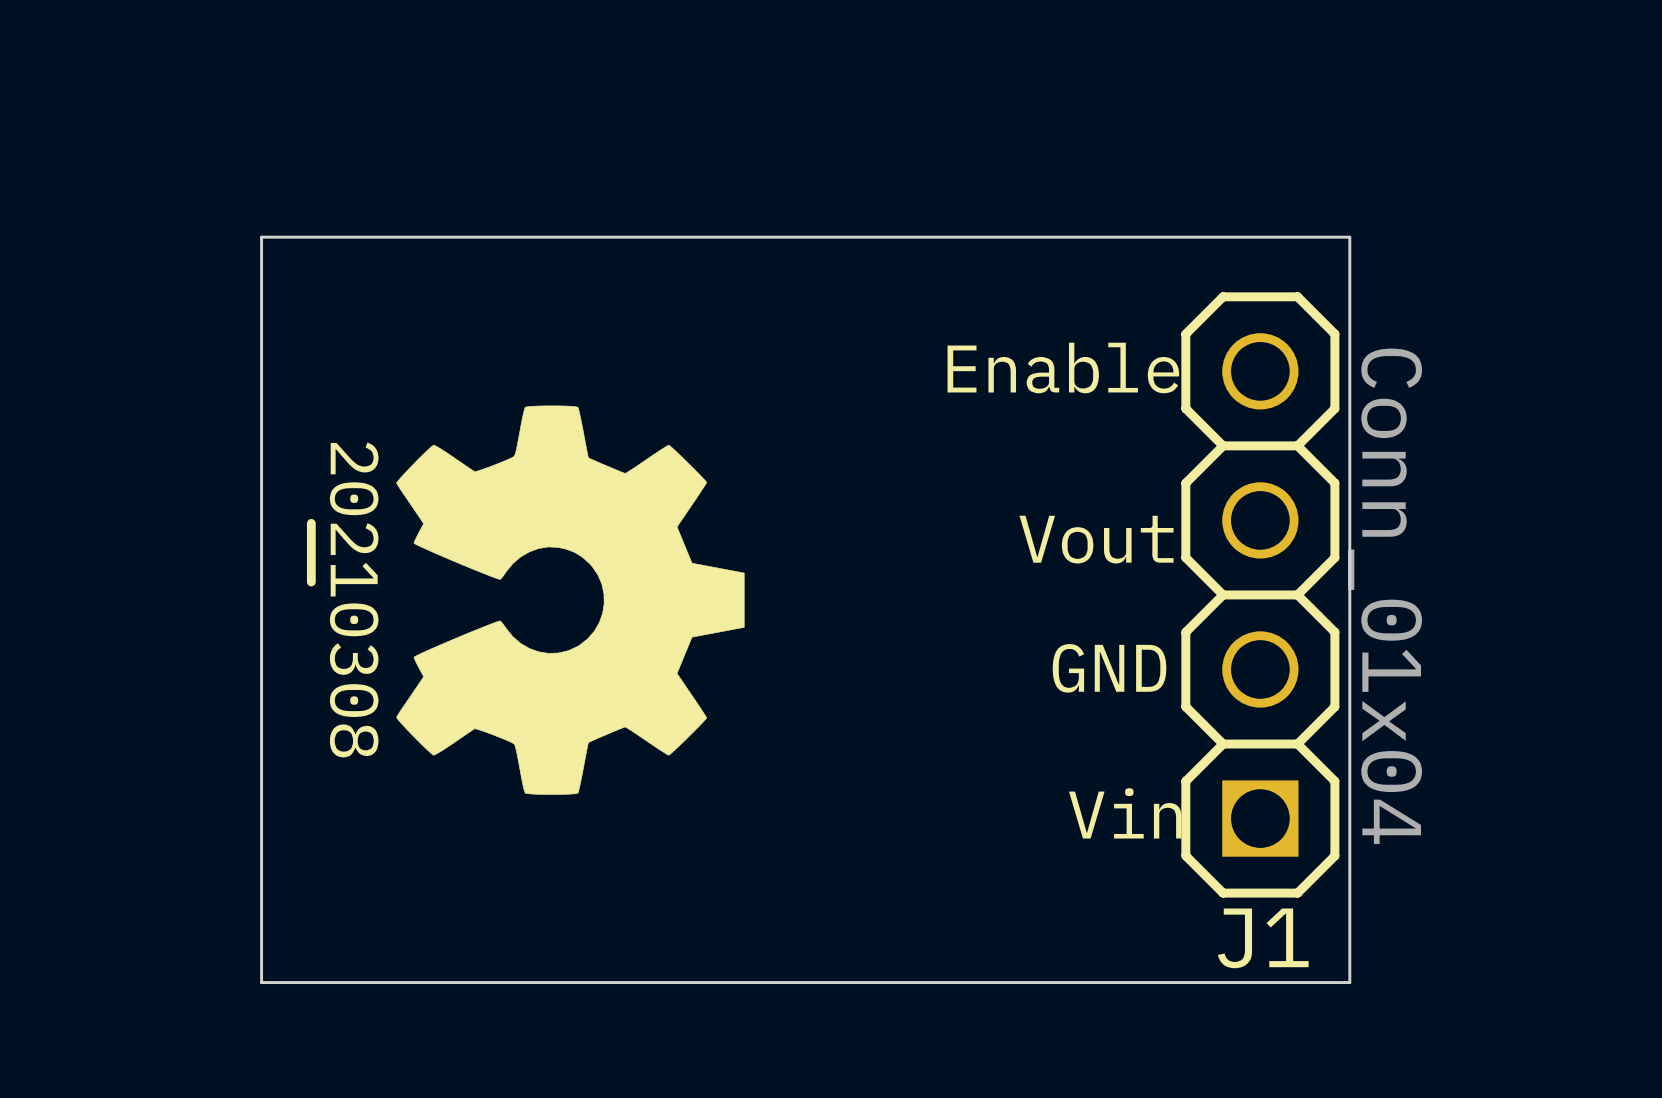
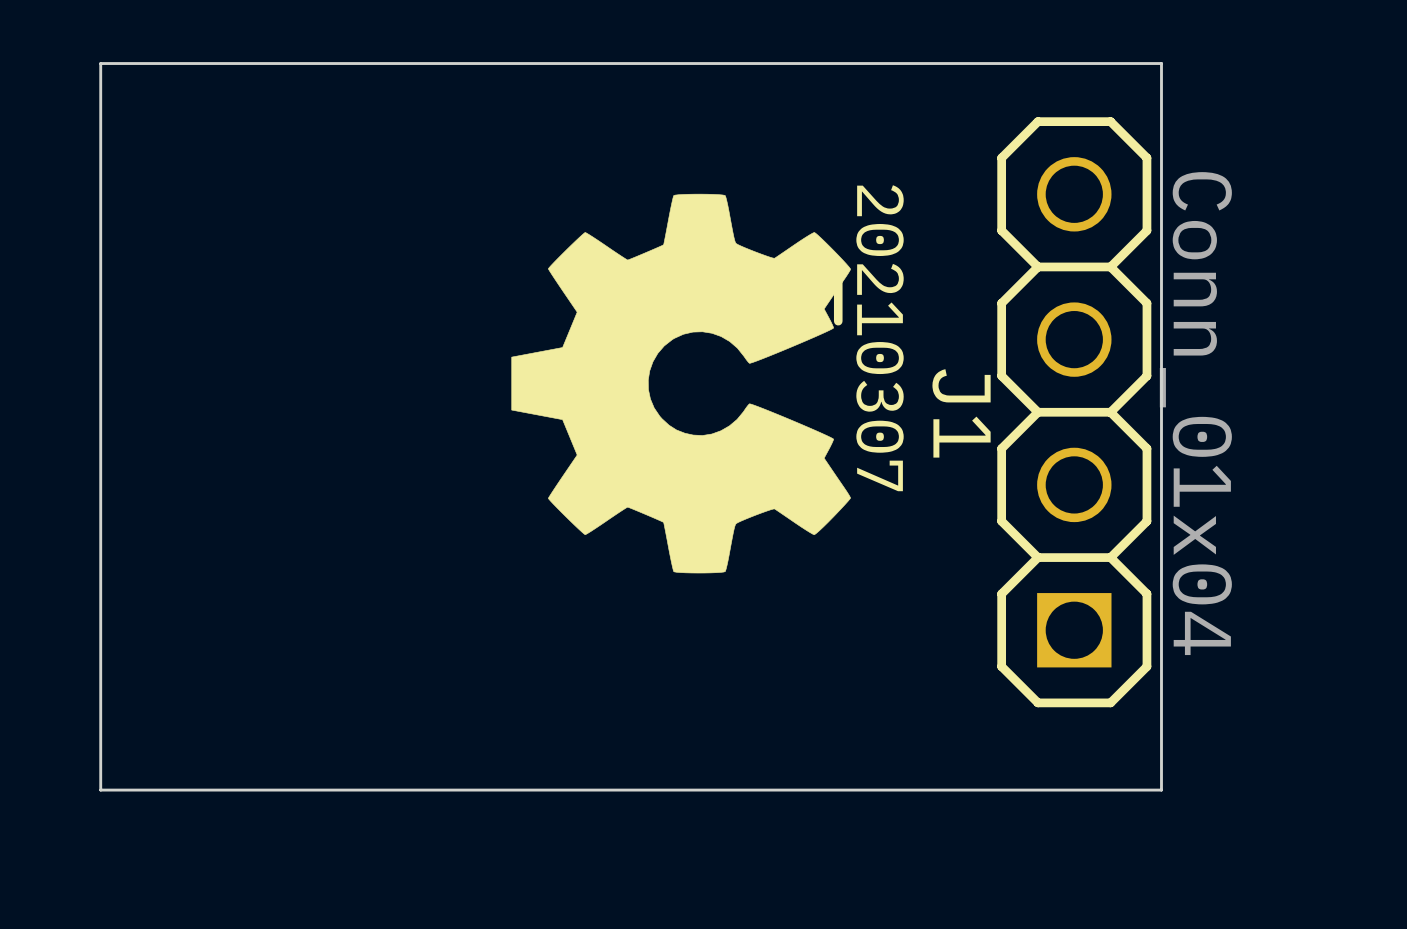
text: Enable (1063, 367) -> none
drawing: none -> [511, 193, 851, 574]
drawing: [306, 405, 745, 795] -> none
text: Vout (1096, 539) -> none
text: GND (1109, 668) -> none
text: Vin (1125, 813) -> none
J1 name rotation: 0° (1263, 938) -> 90° clockwise (961, 413)
J1 name position: J1 (1263, 938) -> J1 (961, 413)

